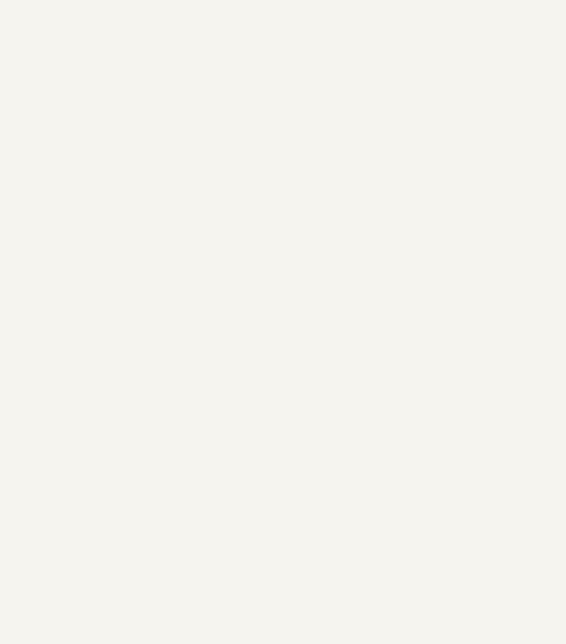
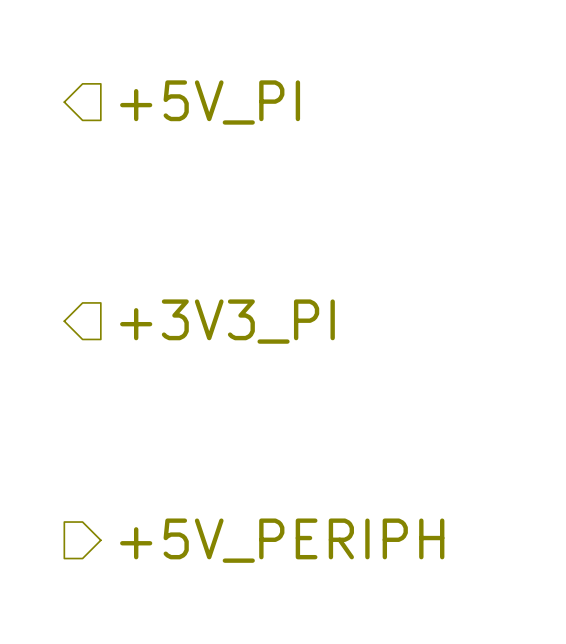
hierarchical label: none -> +5V_PI (210, 102)
hierarchical label: none -> +3V3_PI (227, 321)
hierarchical label: none -> +5V_PERIPH (282, 540)

